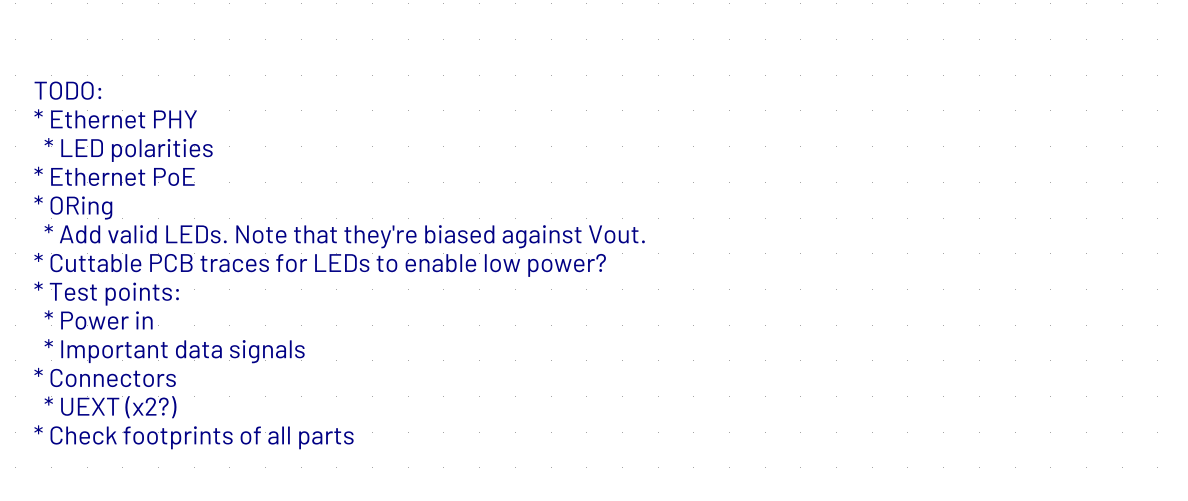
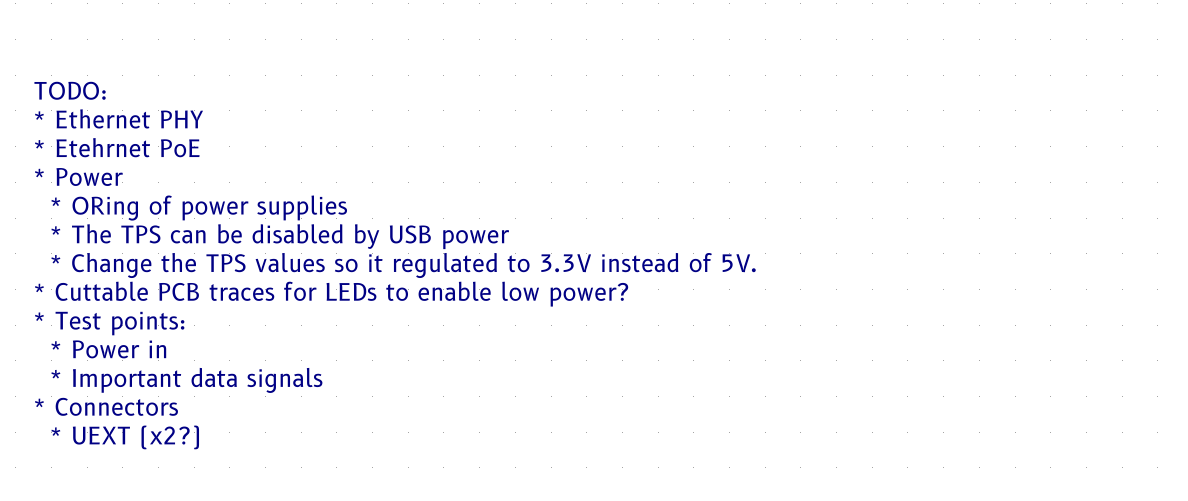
text: * LED polarities (128, 150) -> * Etehrnet PoE (117, 147)
text: * Ethernet PoE (114, 176) -> * Power (78, 177)
text: * ORing (73, 207) -> * ORing of power supplies (199, 208)
text: * Add valid LEDs. Note that they're biased against Vout. (344, 236) -> * The TPS can be disabled by USB power (280, 236)
text: * Cuttable PCB traces for LEDs to enable low power? (320, 264) -> * Change the TPS values so it regulated to 3.3V instead of 5V. (403, 265)
text: * Test points: (106, 293) -> * Cuttable PCB traces for LEDs to enable low power? (331, 294)
text: * Power in (98, 320) -> * Test points: (109, 323)
text: * Important data signals (174, 351) -> * Power in (108, 349)
text: * Connectors (105, 377) -> * Important data signals (186, 380)
text: * UEXT (x2?) (110, 407) -> * Connectors (106, 406)
text: * Check footprints of all parts (193, 437) -> * UEXT (x2?) (125, 437)

